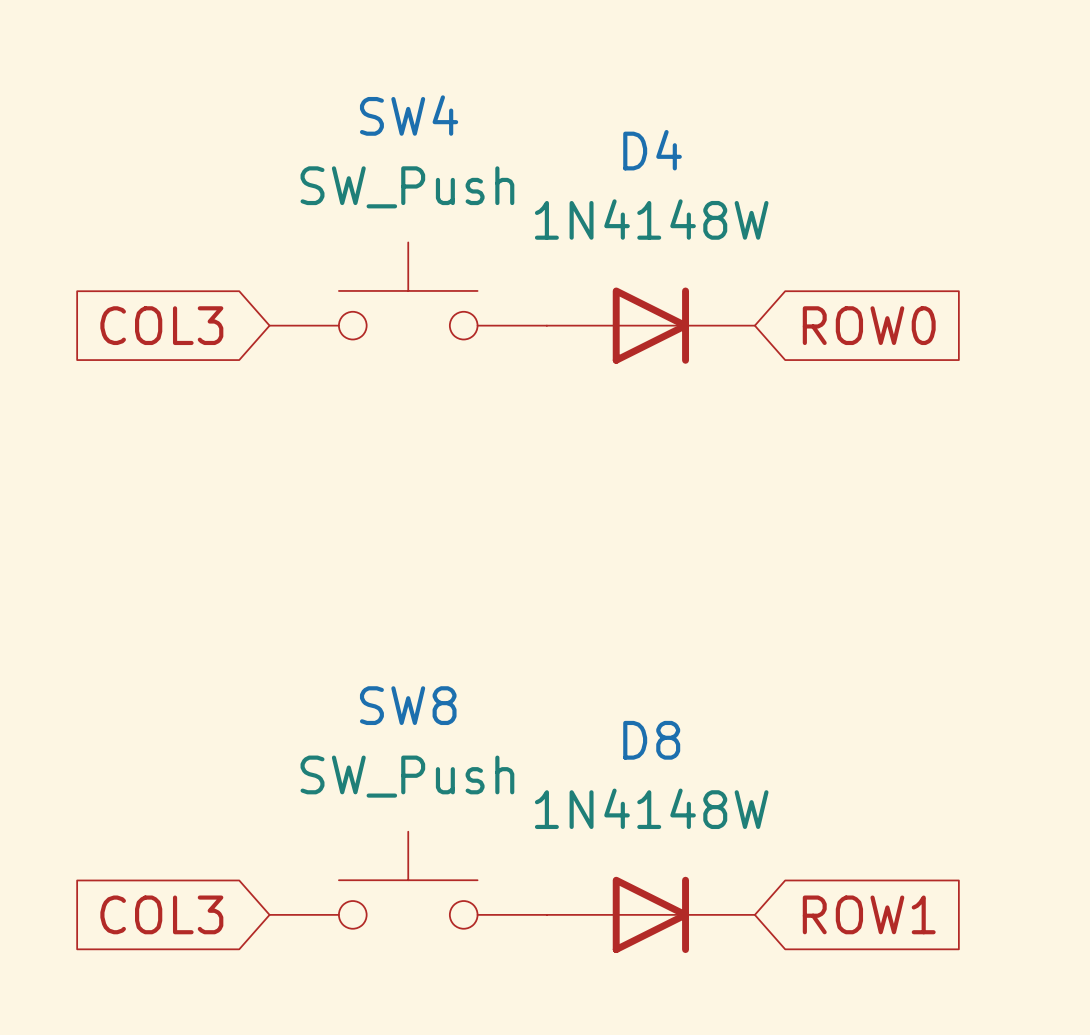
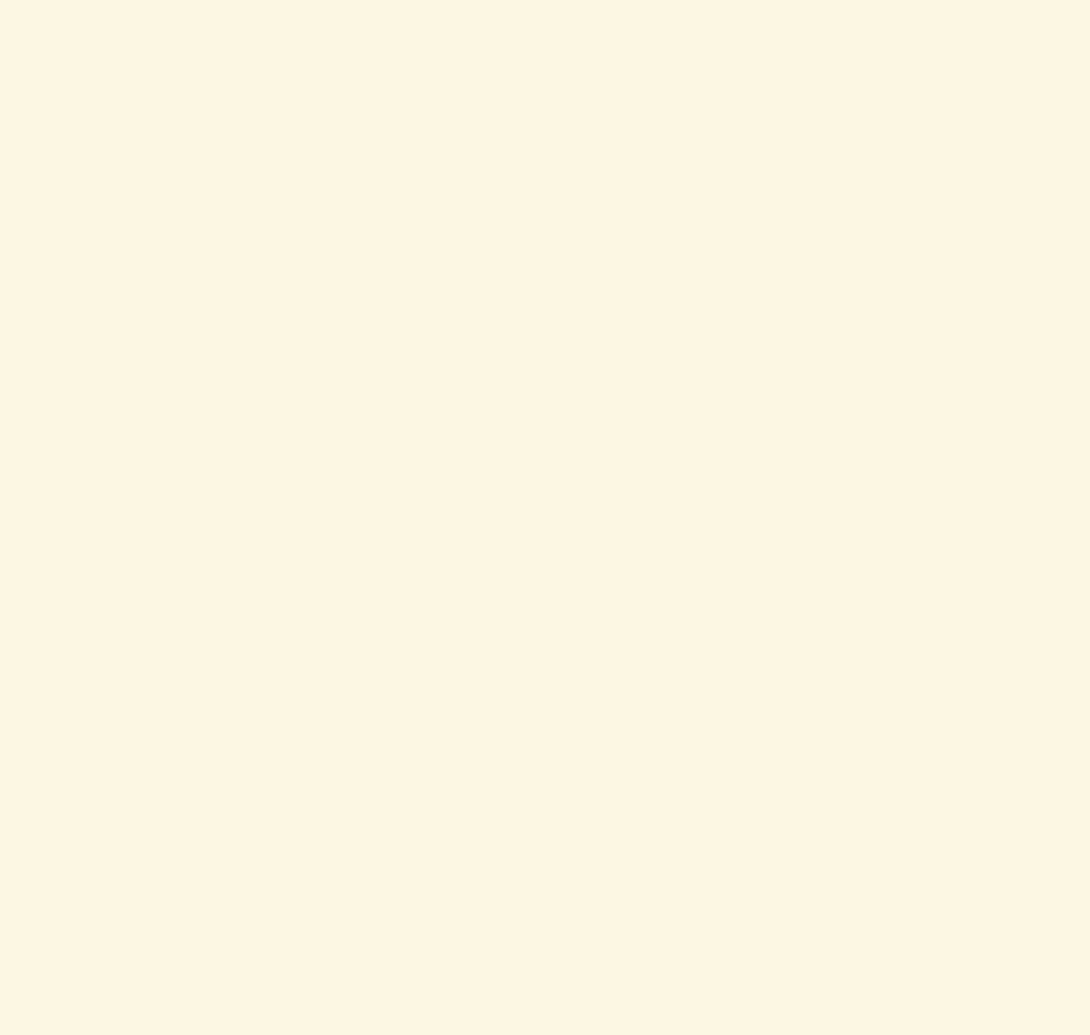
SW4: SW_Push (408, 290) -> none
global label: COL3 (161, 325) -> none
D4: 1N4148W (650, 325) -> none
global label: ROW0 (869, 325) -> none
SW8: SW_Push (408, 880) -> none
global label: COL3 (161, 914) -> none
D8: 1N4148W (650, 914) -> none
global label: ROW1 (869, 914) -> none

